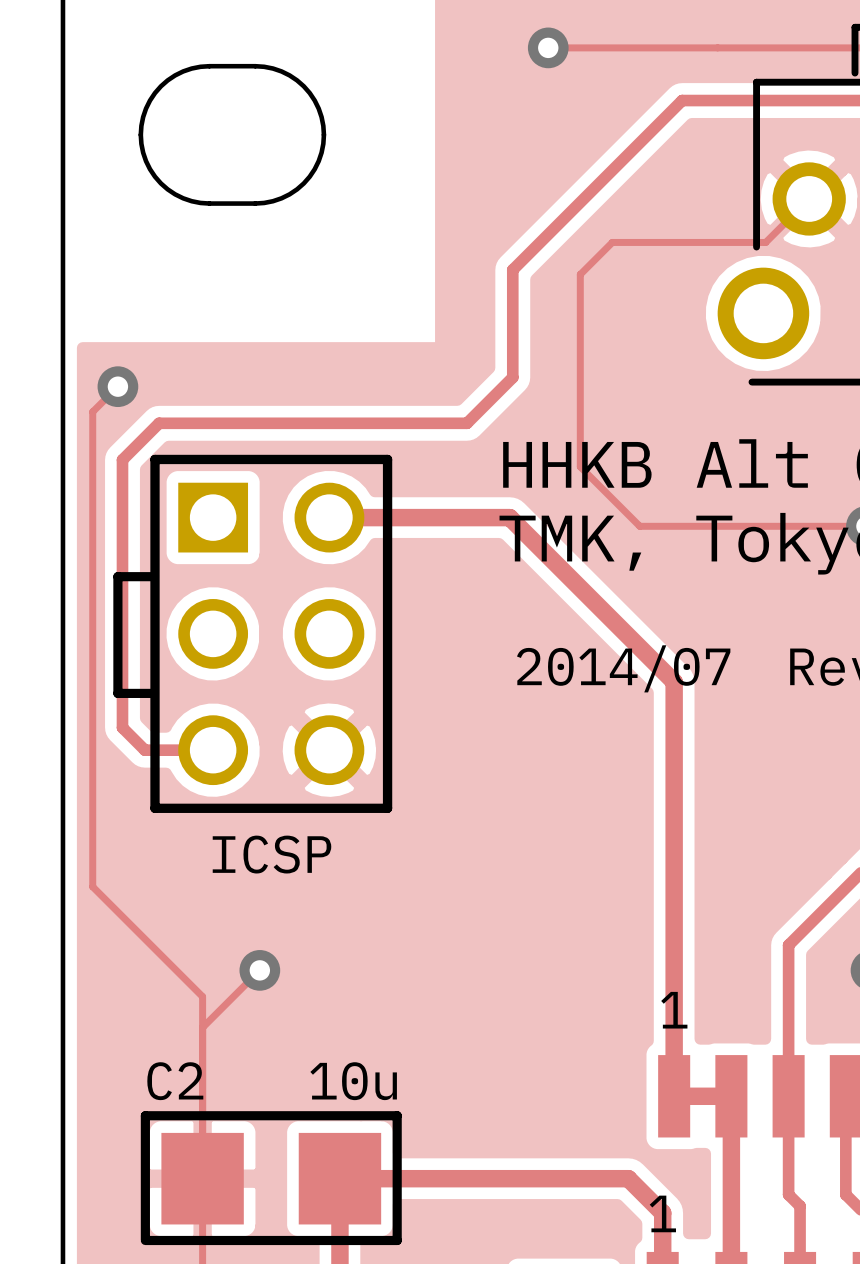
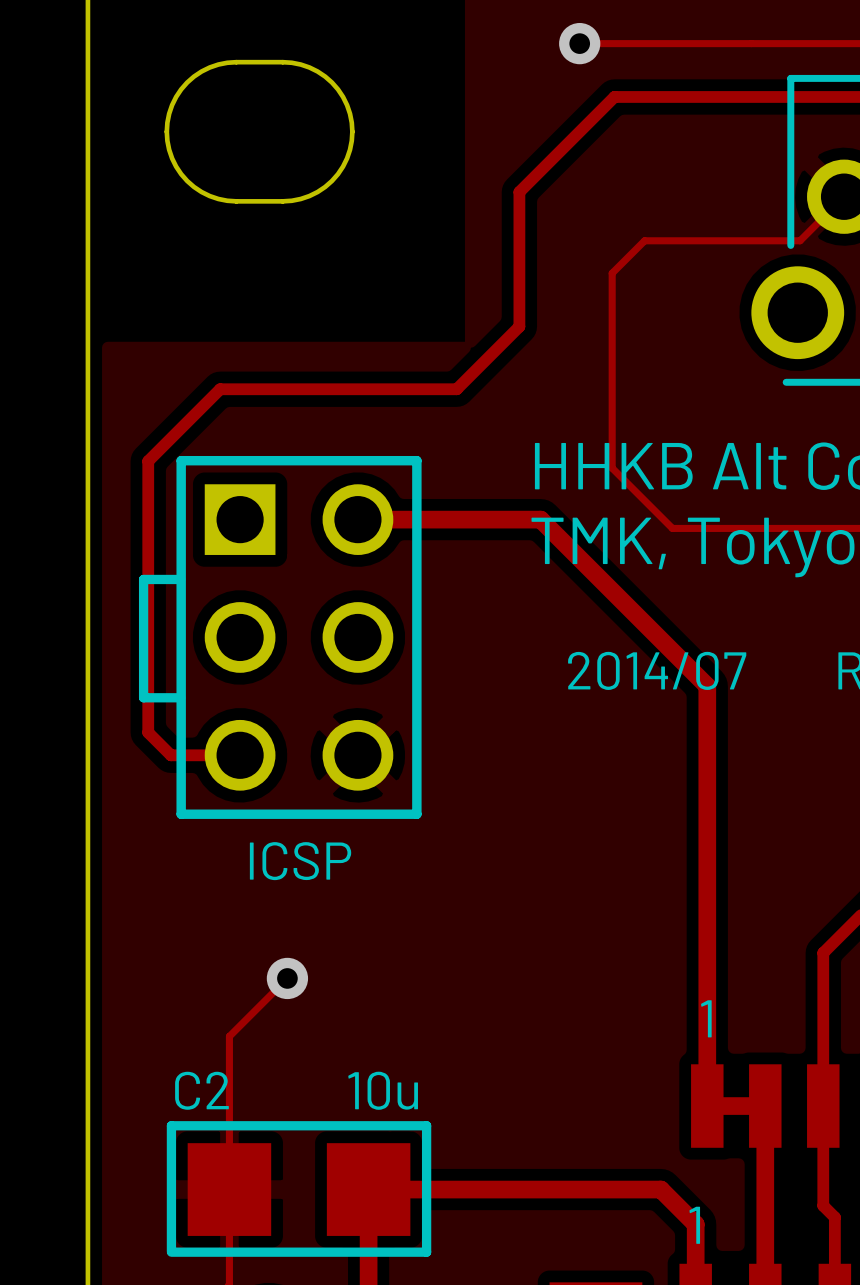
track: (682, 100) (512, 269) (512, 377) (467, 423) (159, 423) -> (715, 96) (614, 96) (519, 192) (519, 326) (456, 389) (220, 389) (185, 424)
track: (117, 386) (92, 411) (92, 886) (202, 996) (202, 1027) -> none
via: (117, 386) -> none

